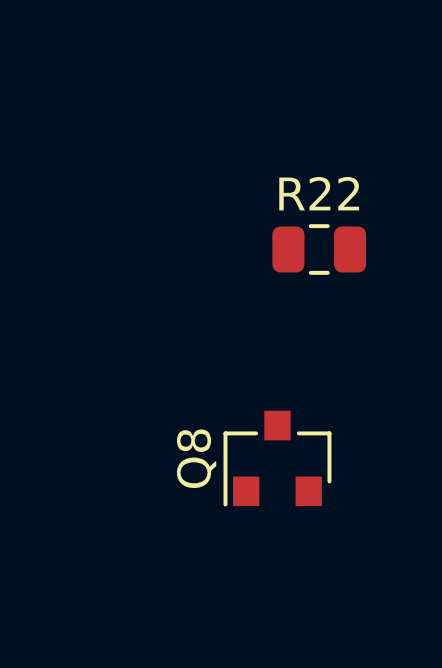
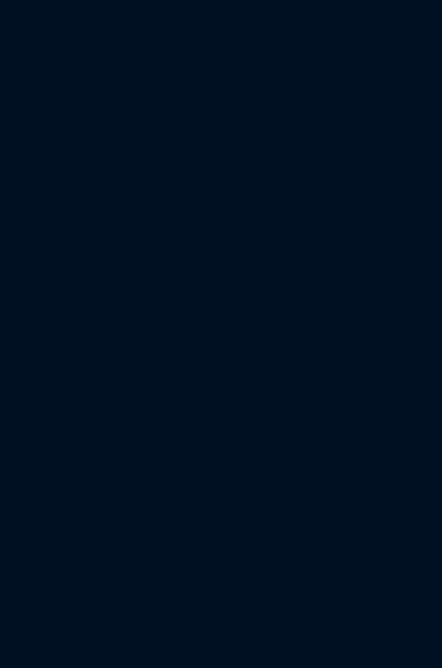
R22: (319, 249) -> none
Q8: (277, 458) -> none

